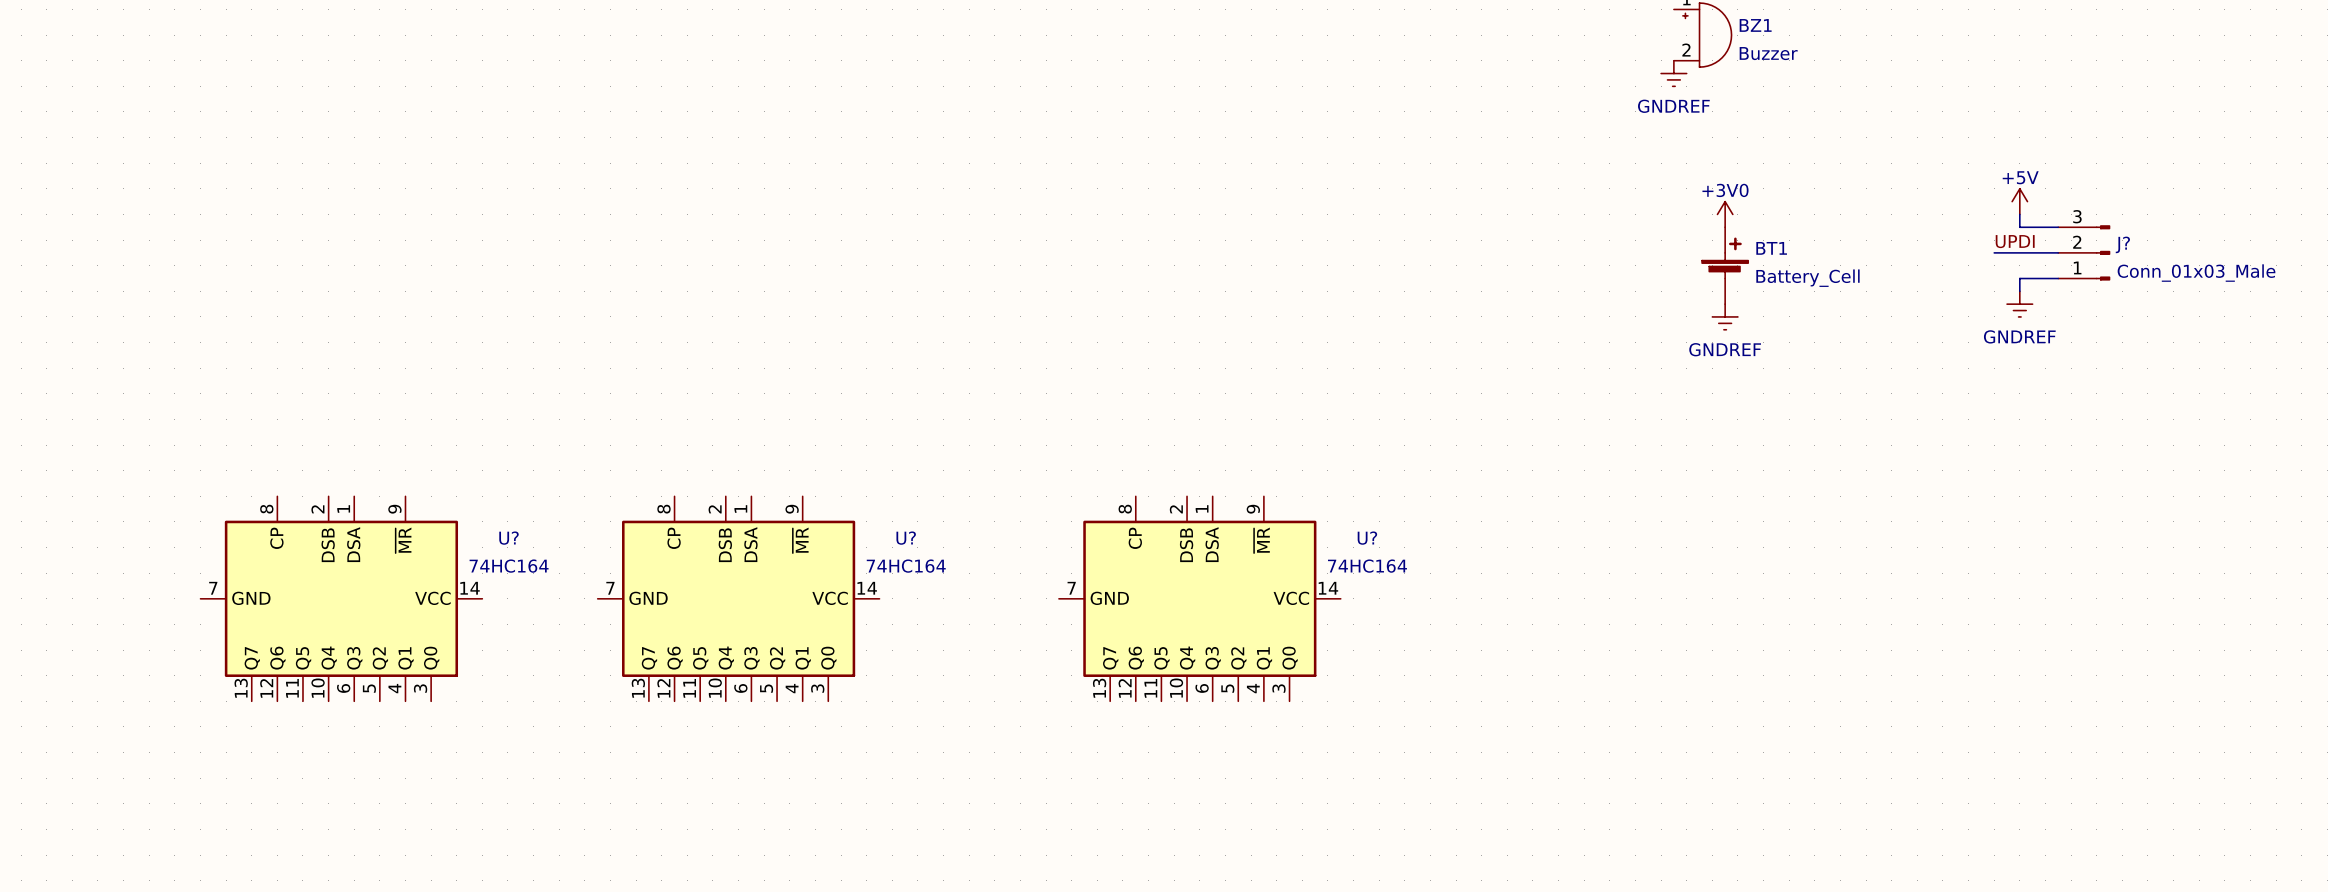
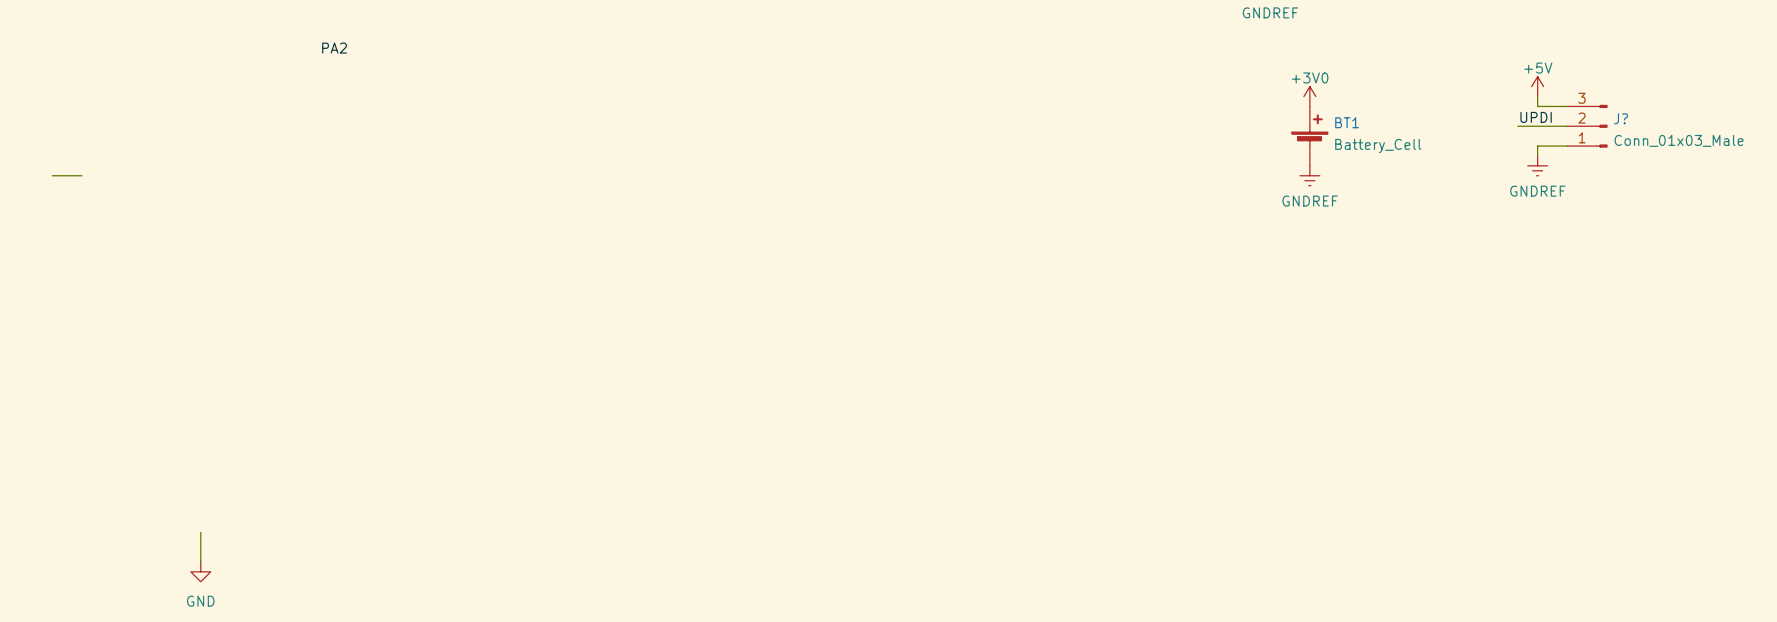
label: none -> PA2 (334, 48)
wire: none -> (52, 175) (81, 175)
U?: 74HC164 (341, 598) -> none
U?: 74HC164 (738, 598) -> none
U?: 74HC164 (1199, 598) -> none
wire: none -> (200, 532) (200, 561)
power symbol: none -> GND (200, 571)

